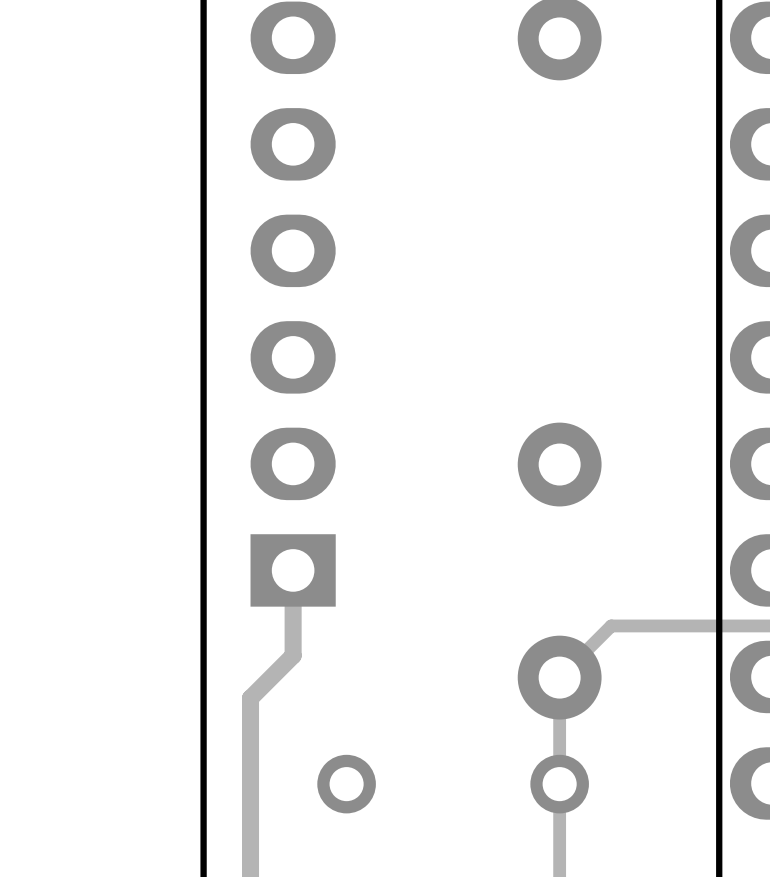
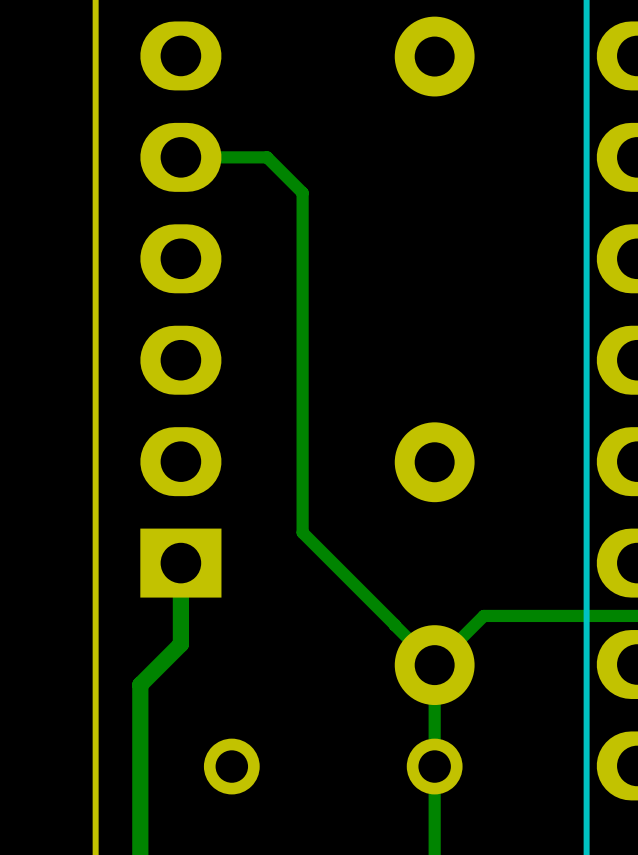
track: none -> (180, 157) (267, 157) (302, 192) (302, 532) (434, 665)

